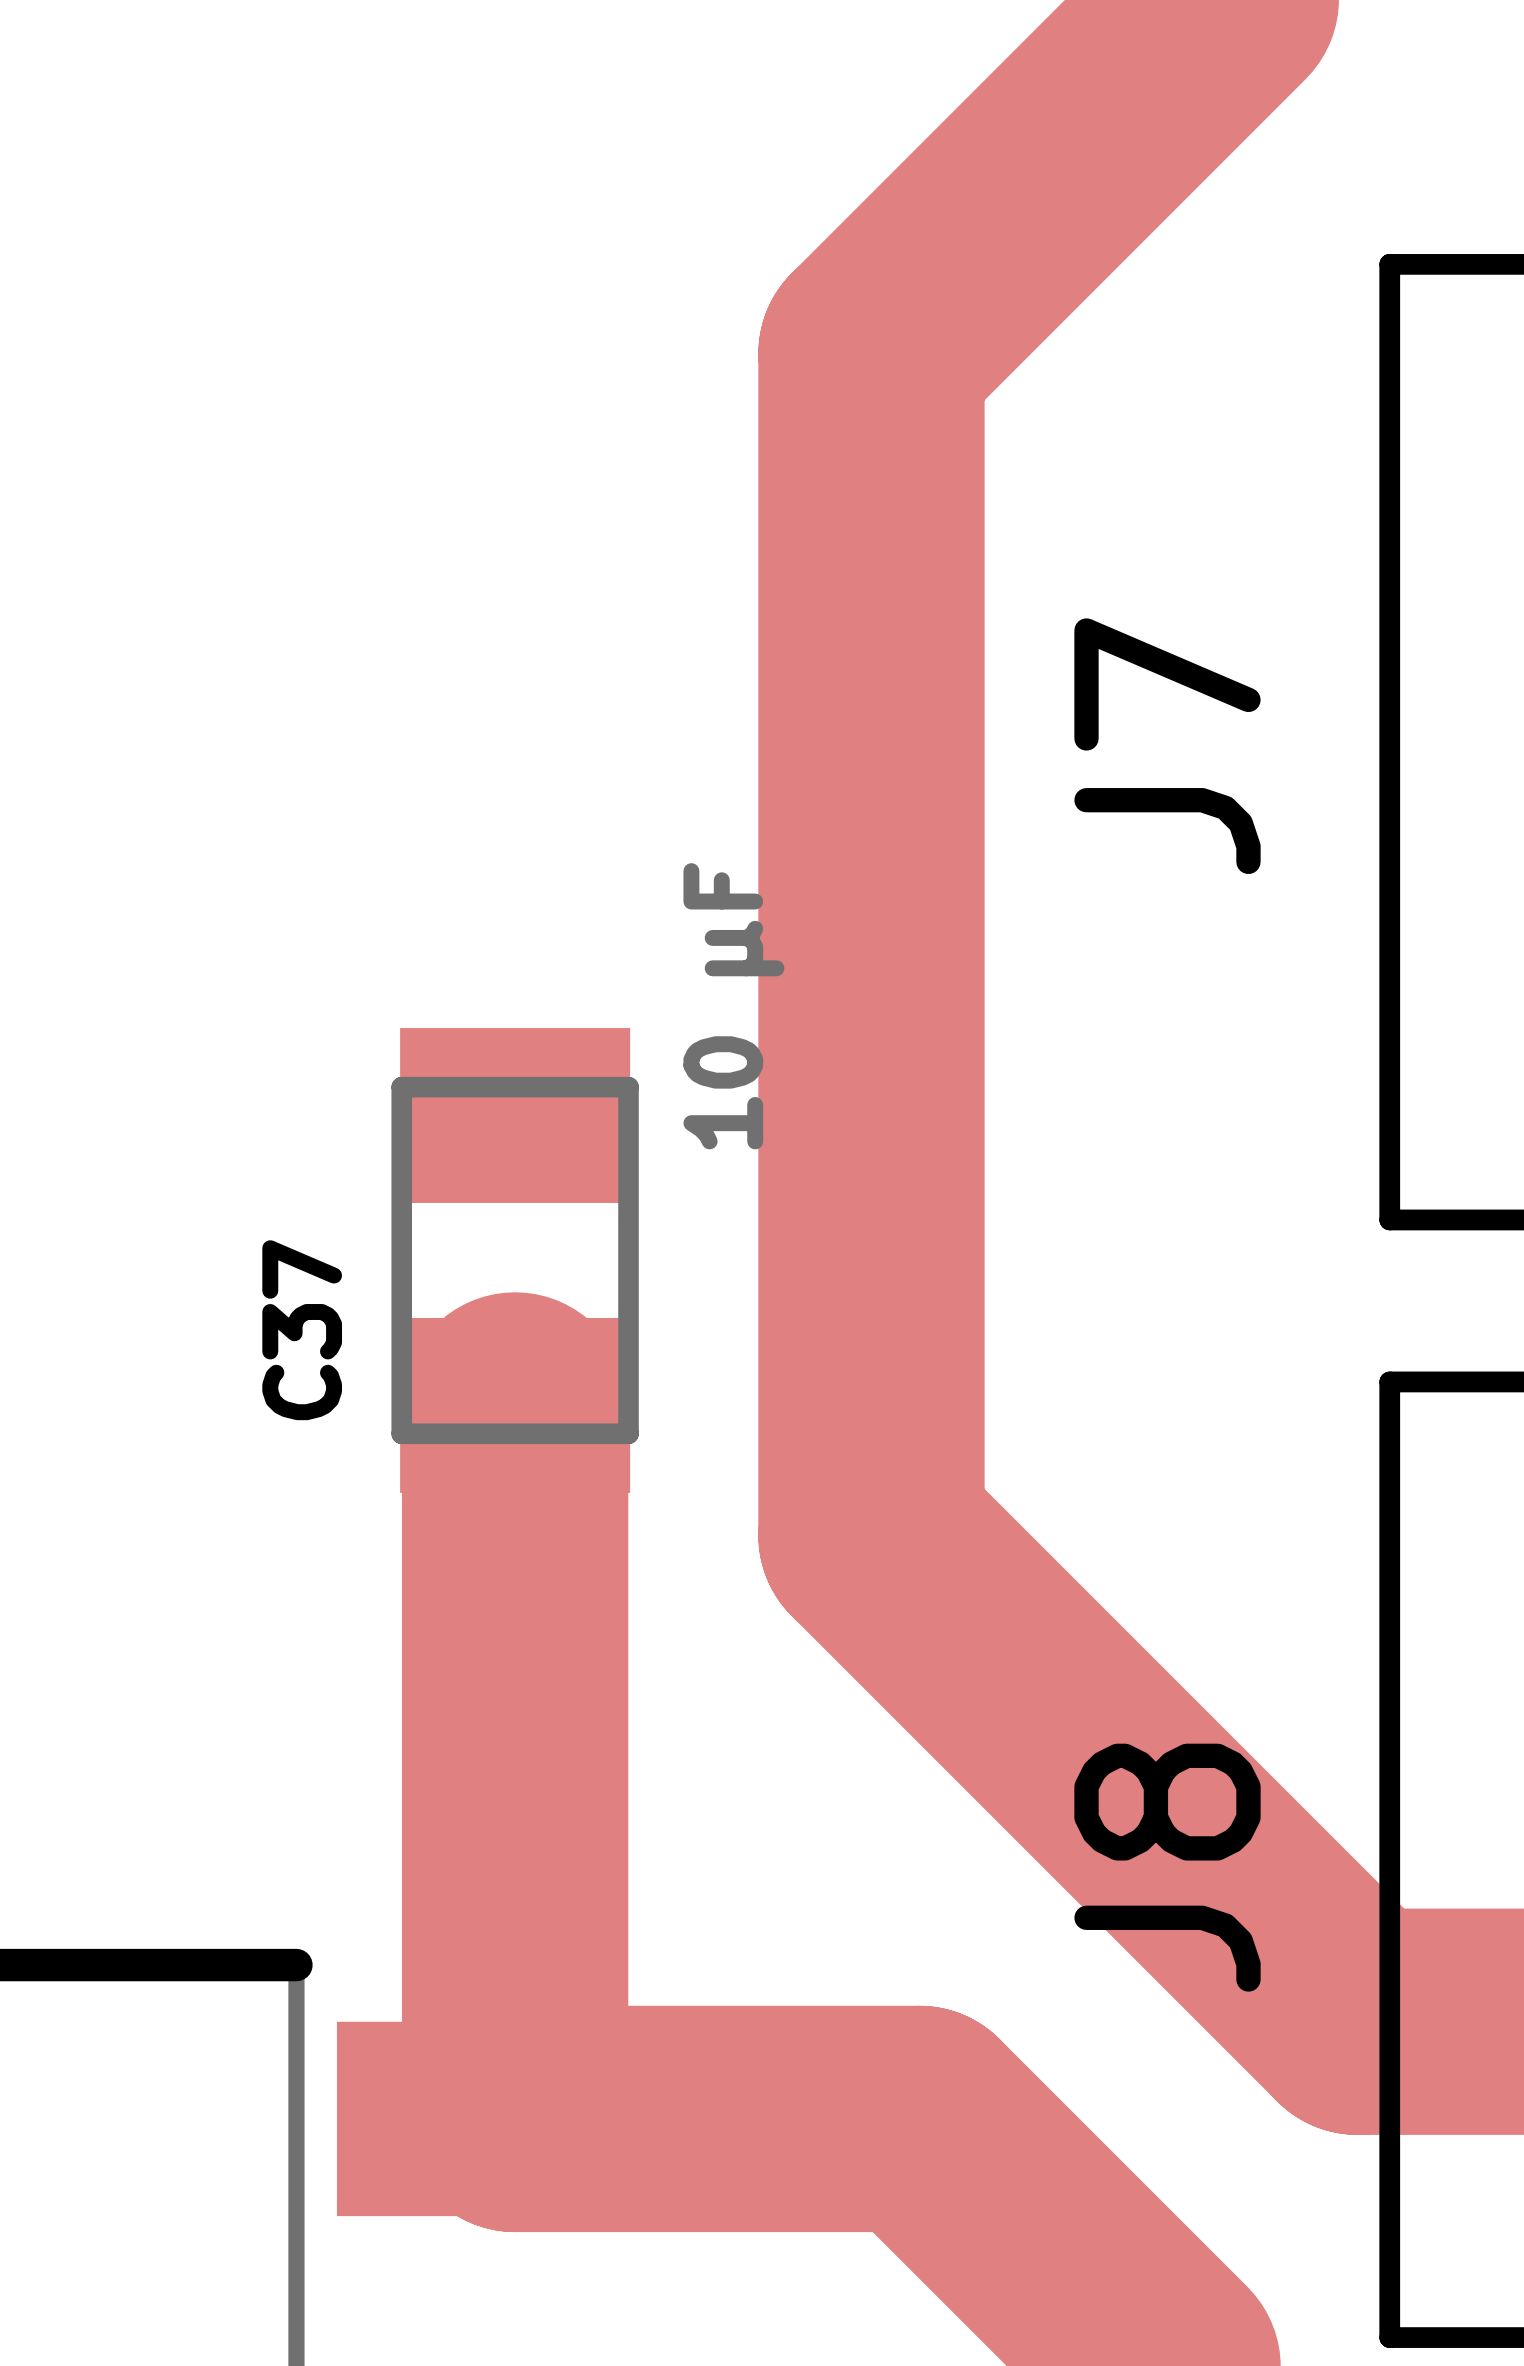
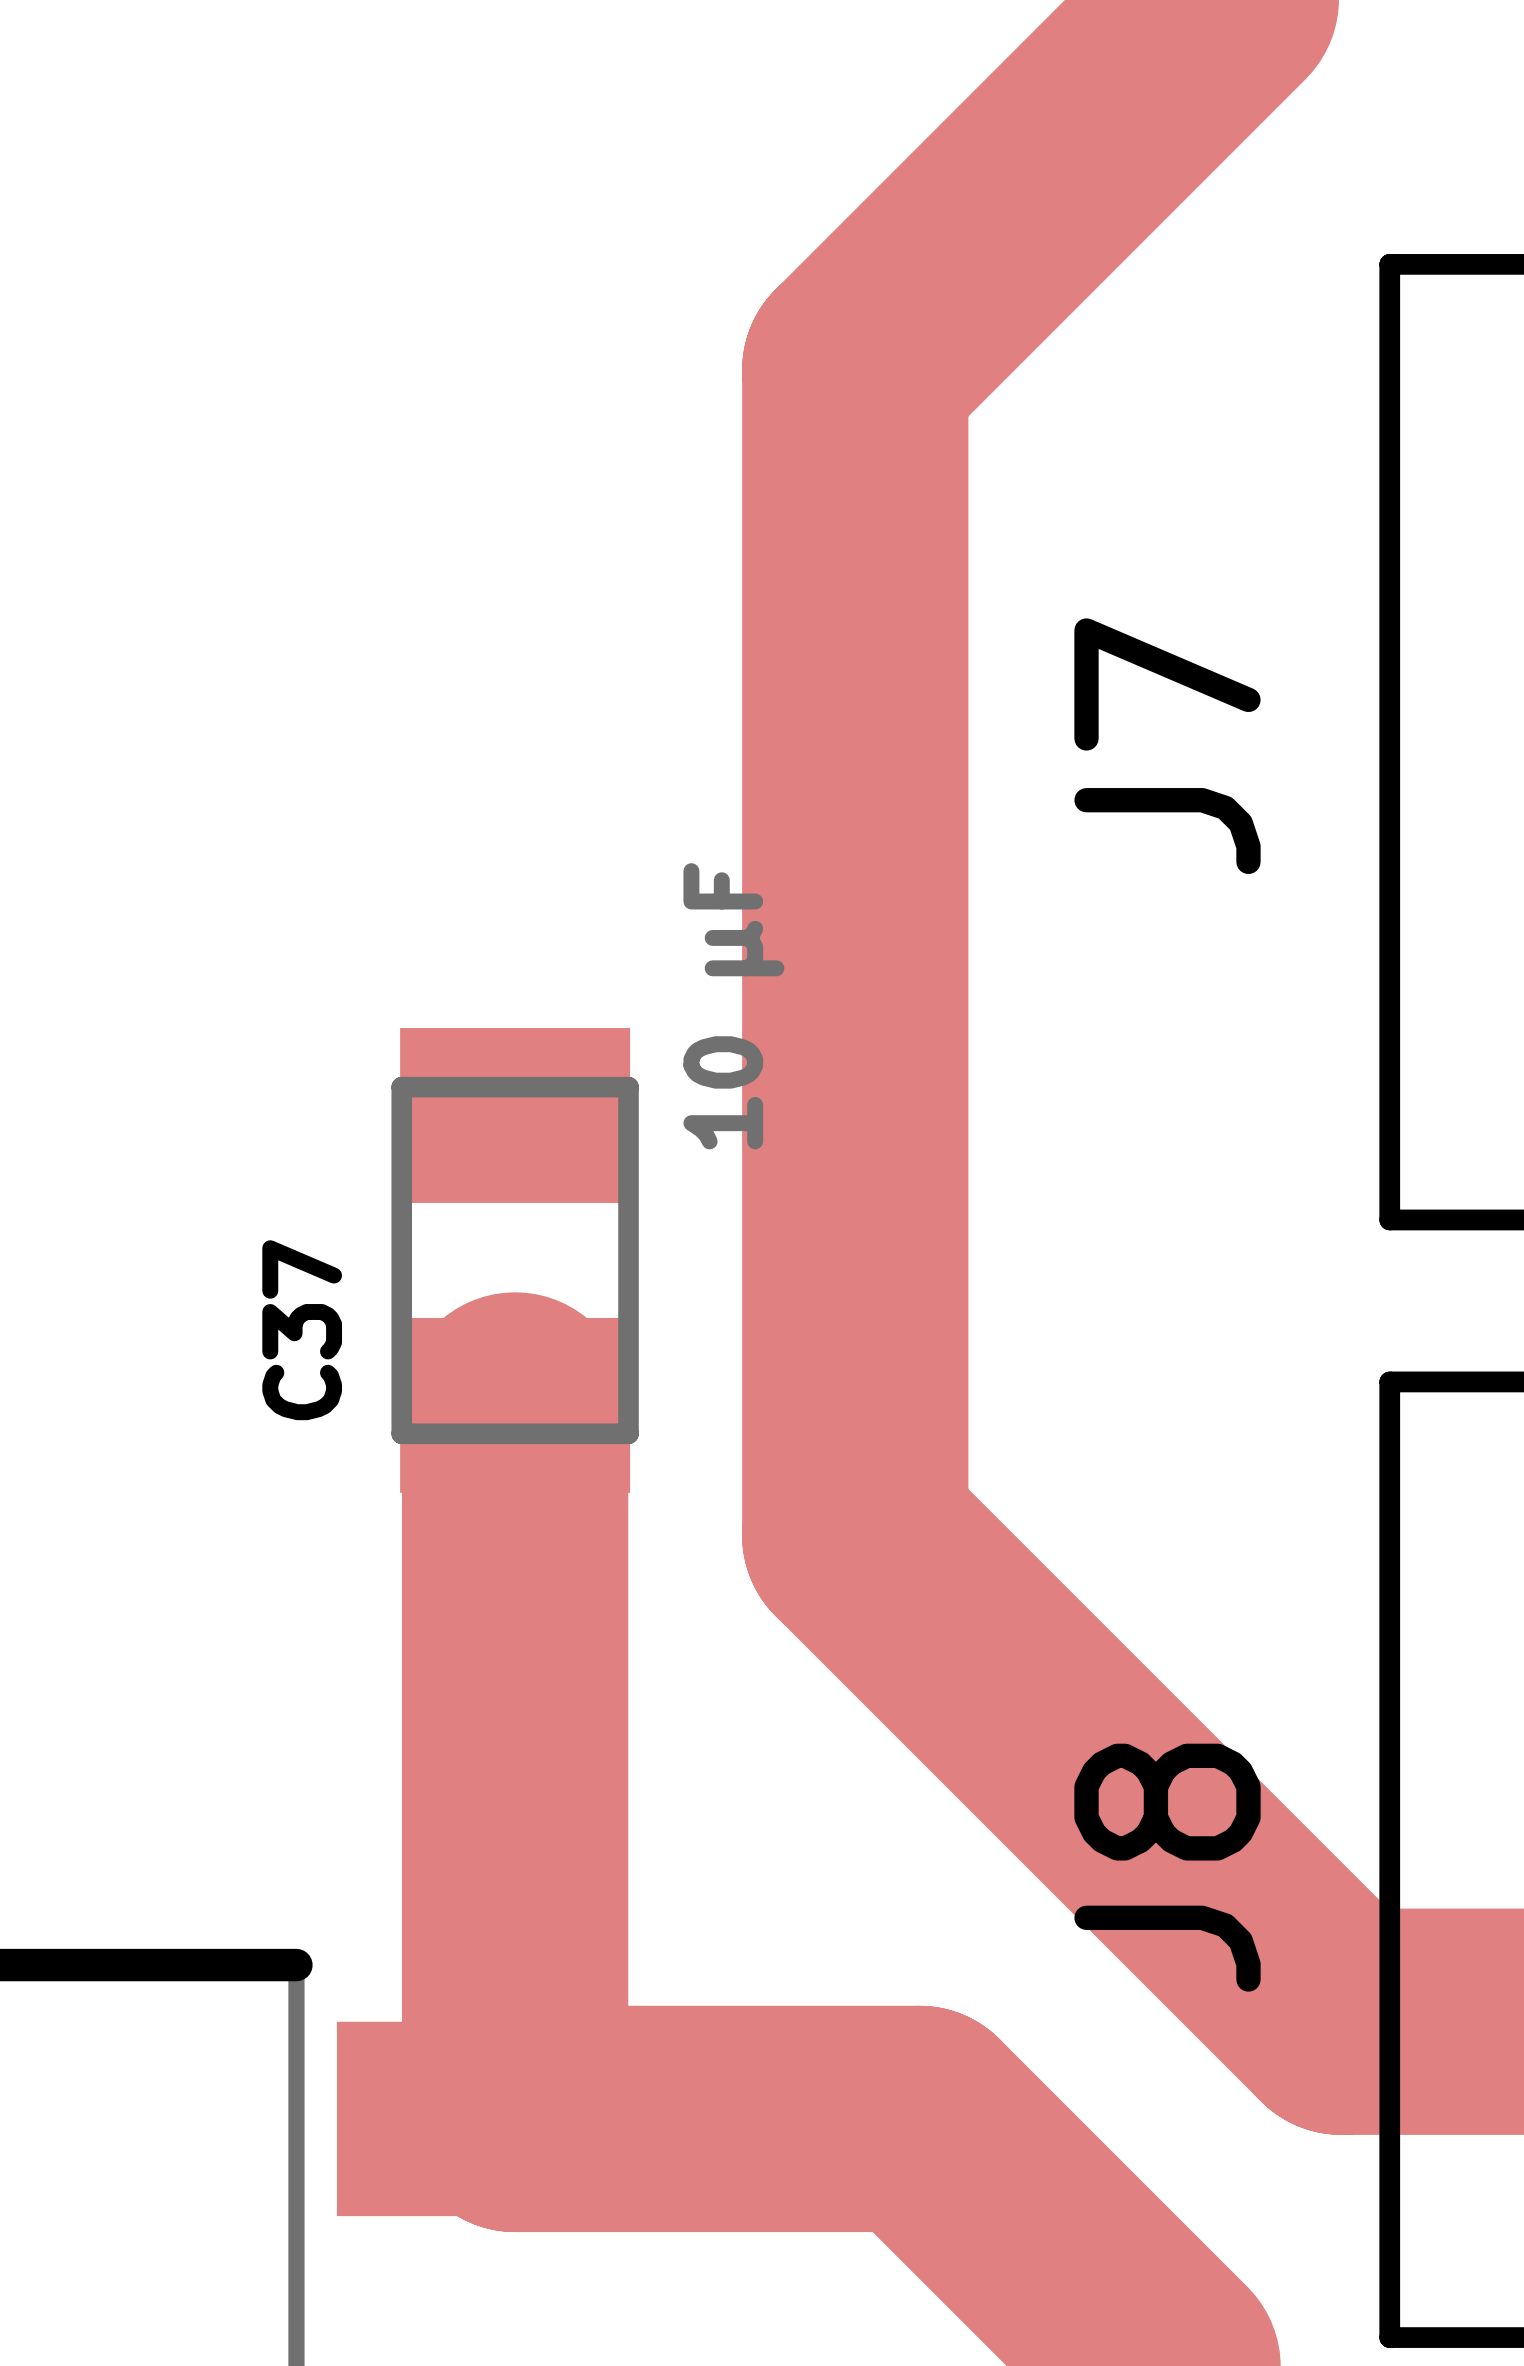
top track: (871, 353) (871, 1535) (1357, 2021) -> (871, 353) (855, 369) (855, 1535) (1341, 2021) (1357, 2021)

